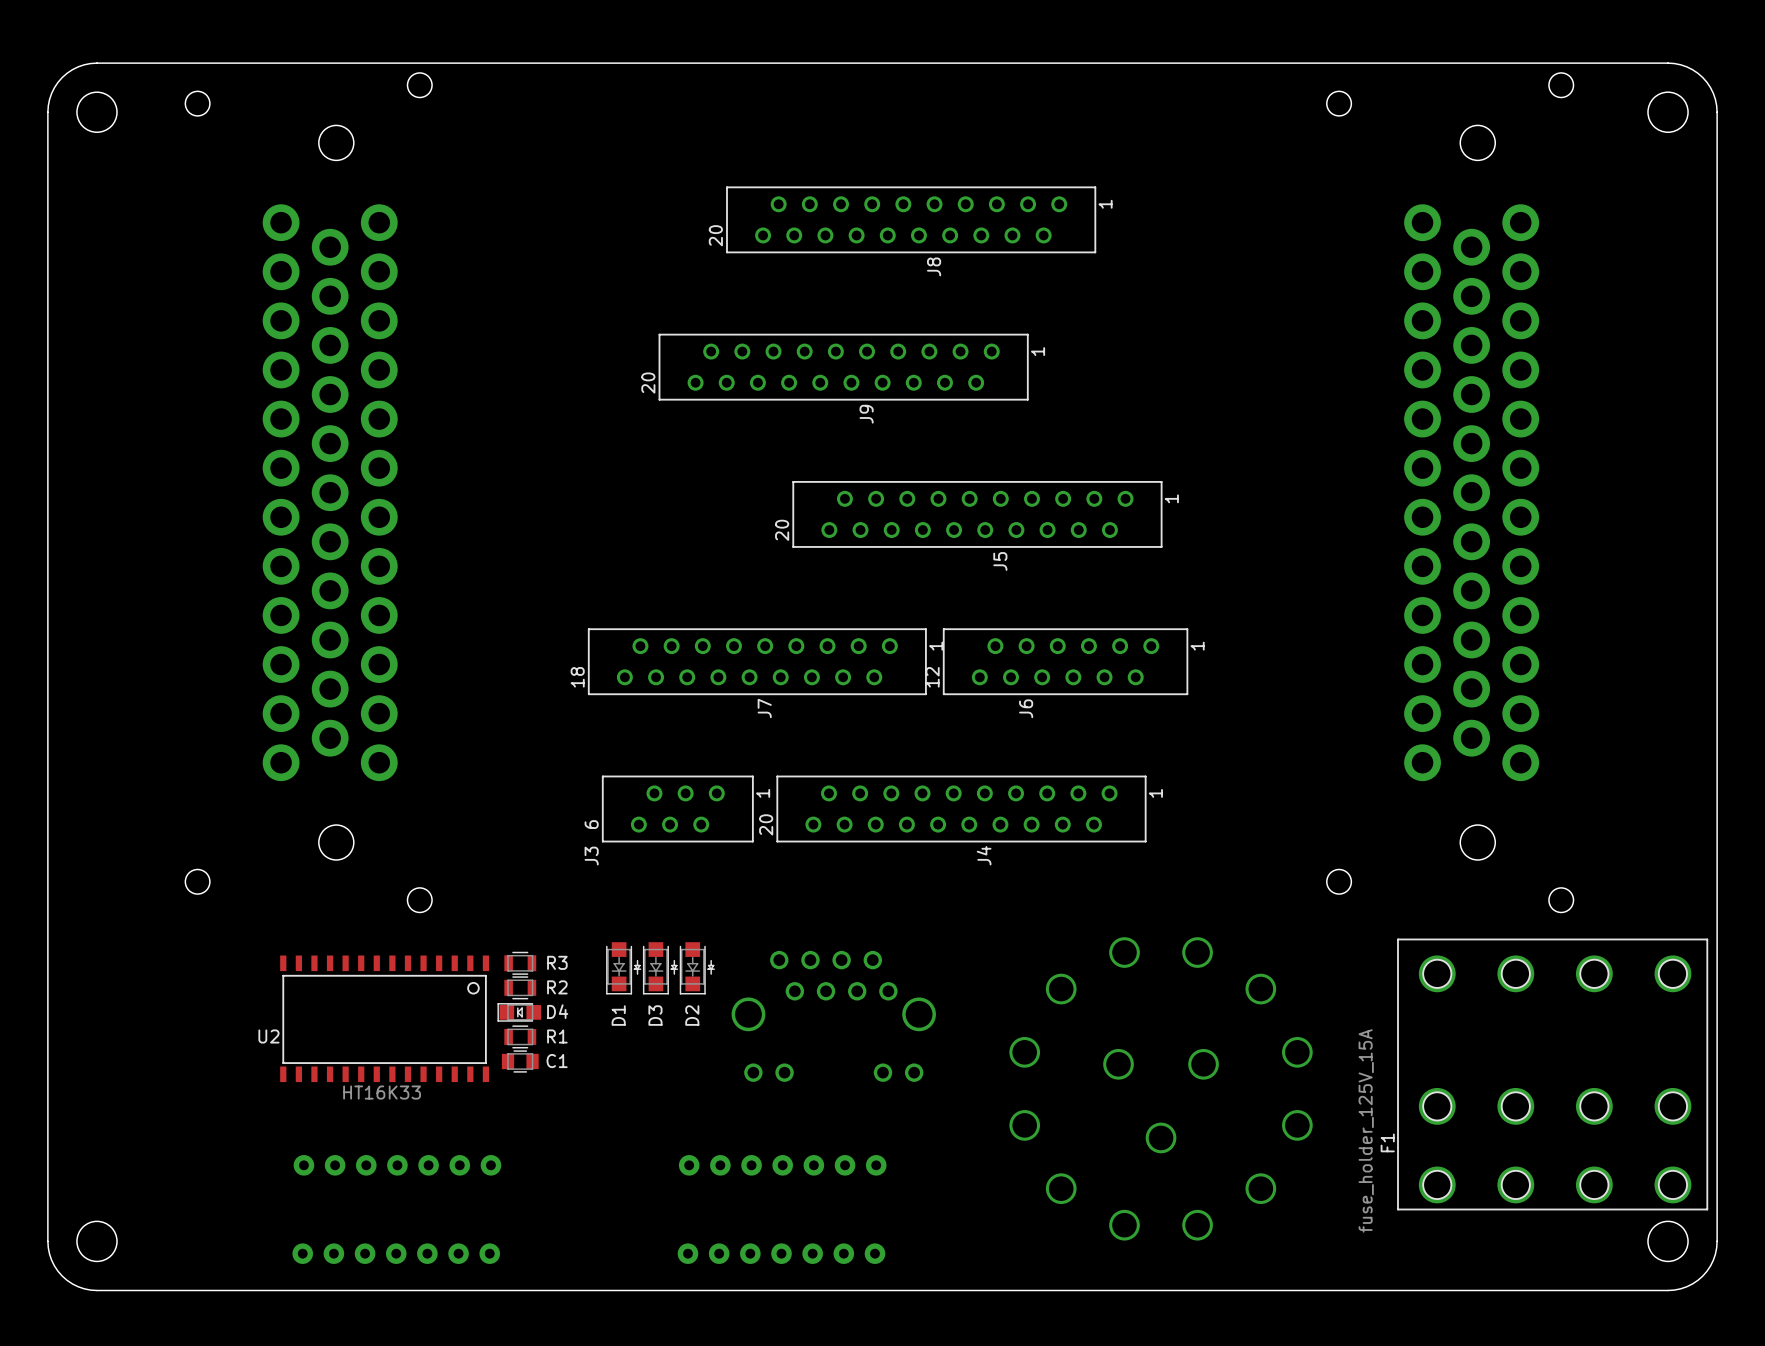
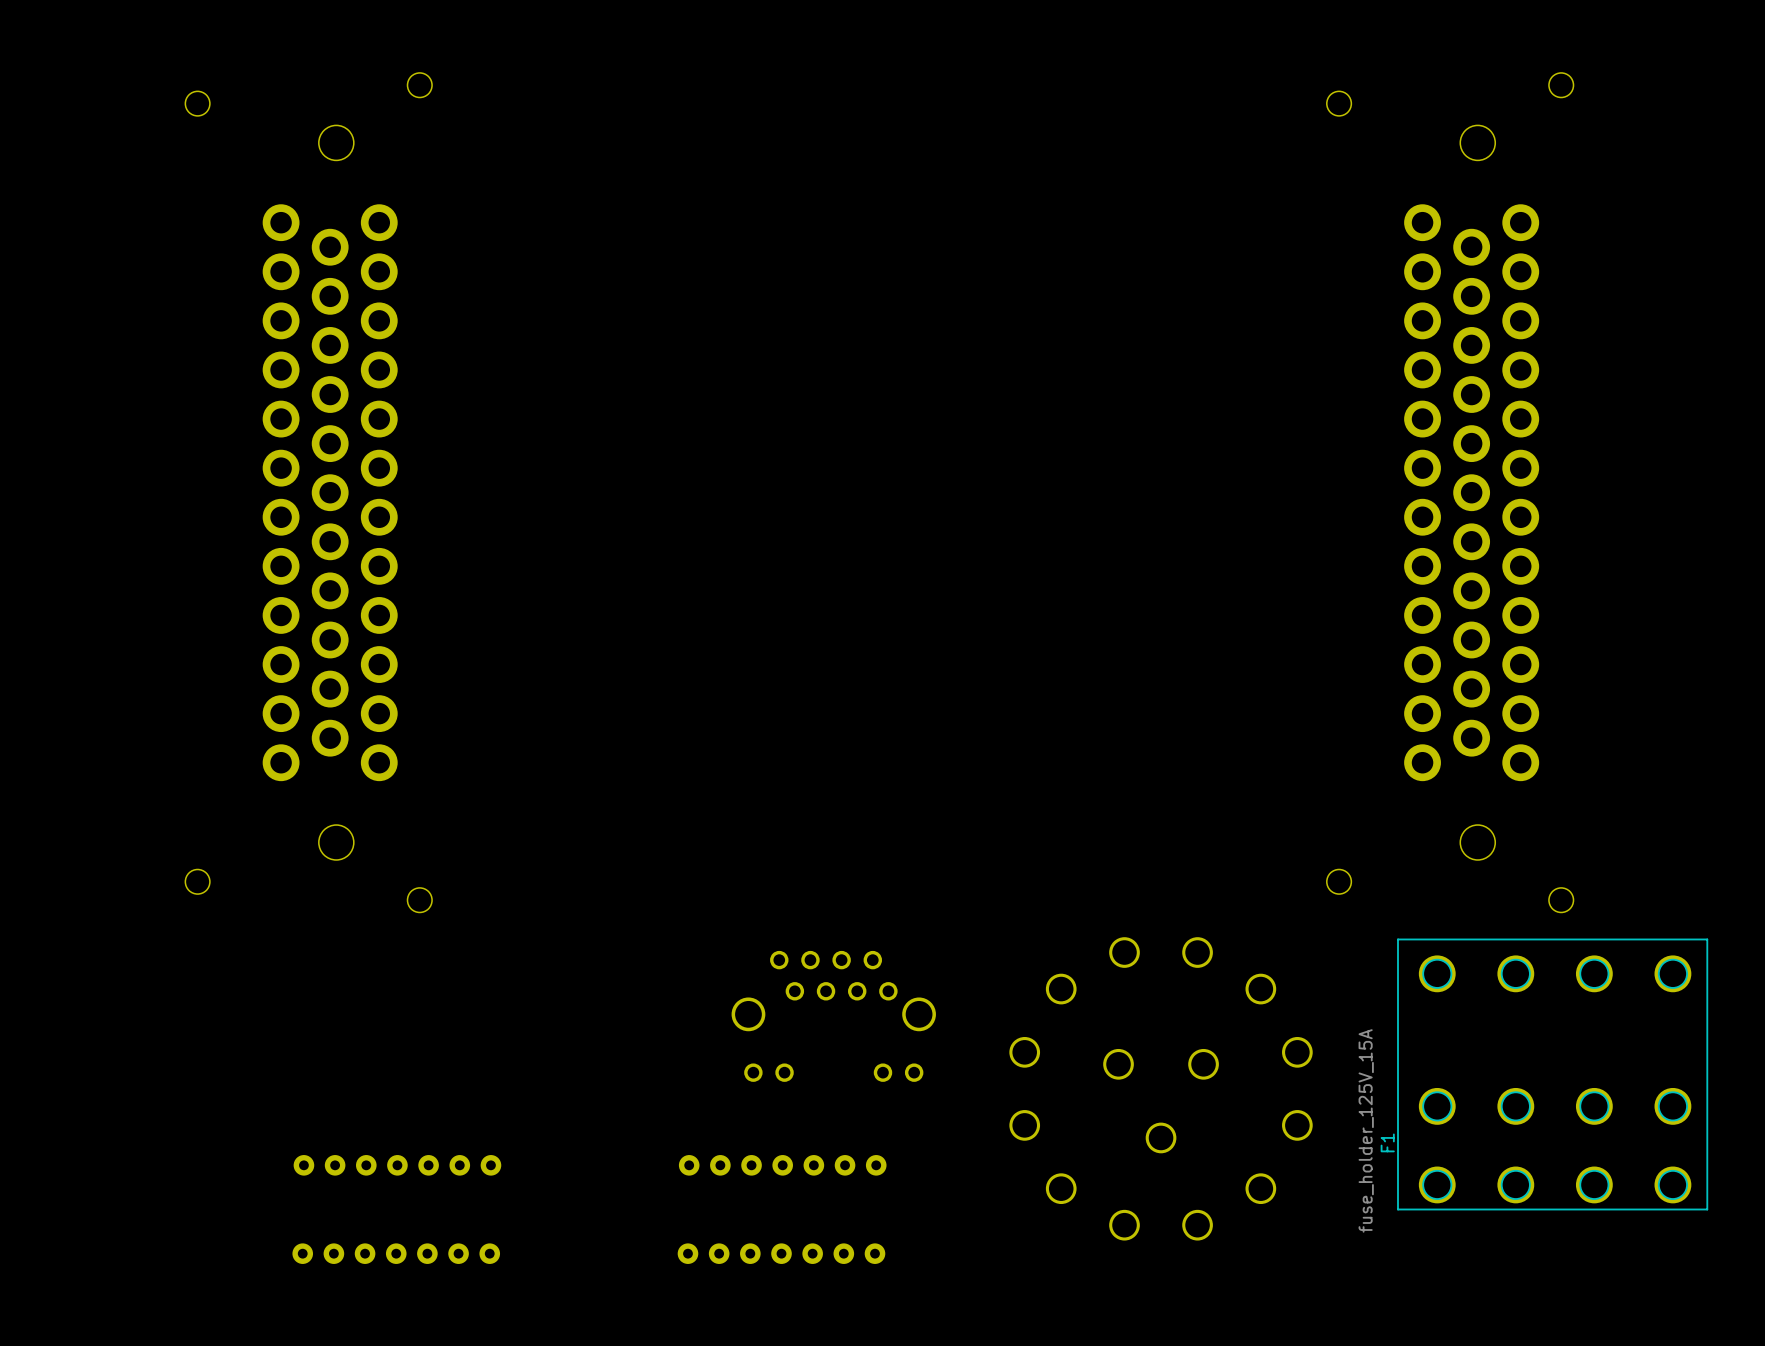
board edge: (96, 63) (1668, 63) (1686, 66) (1697, 73) (1710, 87) (1715, 99) (1717, 112) (1717, 1241) (1713, 1260) (1706, 1271) (1692, 1283) (1680, 1288) (1668, 1290) (96, 1290) (78, 1286) (67, 1280) (58, 1271) (51, 1260) (47, 1241) (47, 112) (51, 93) (62, 77) (78, 66) (96, 63) -> none
round board edge: [76, 91, 118, 133] -> none
round board edge: [1647, 91, 1689, 133] -> none
J8: (911, 219) -> none
J9: (843, 367) -> none
J5: (977, 514) -> none
J7: (757, 661) -> none
J6: (1065, 661) -> none
J3: (677, 809) -> none
J4: (961, 809) -> none
R3: (520, 963) -> none
D1: (623, 968) -> none
D3: (660, 968) -> none
D2: (697, 968) -> none
R2: (520, 987) -> none
D4: (519, 1012) -> none
U2: HT16K33 (384, 1018) -> none
R1: (520, 1036) -> none
C1: (520, 1061) -> none
round board edge: [76, 1220, 118, 1263] -> none
round board edge: [1647, 1220, 1689, 1263] -> none

